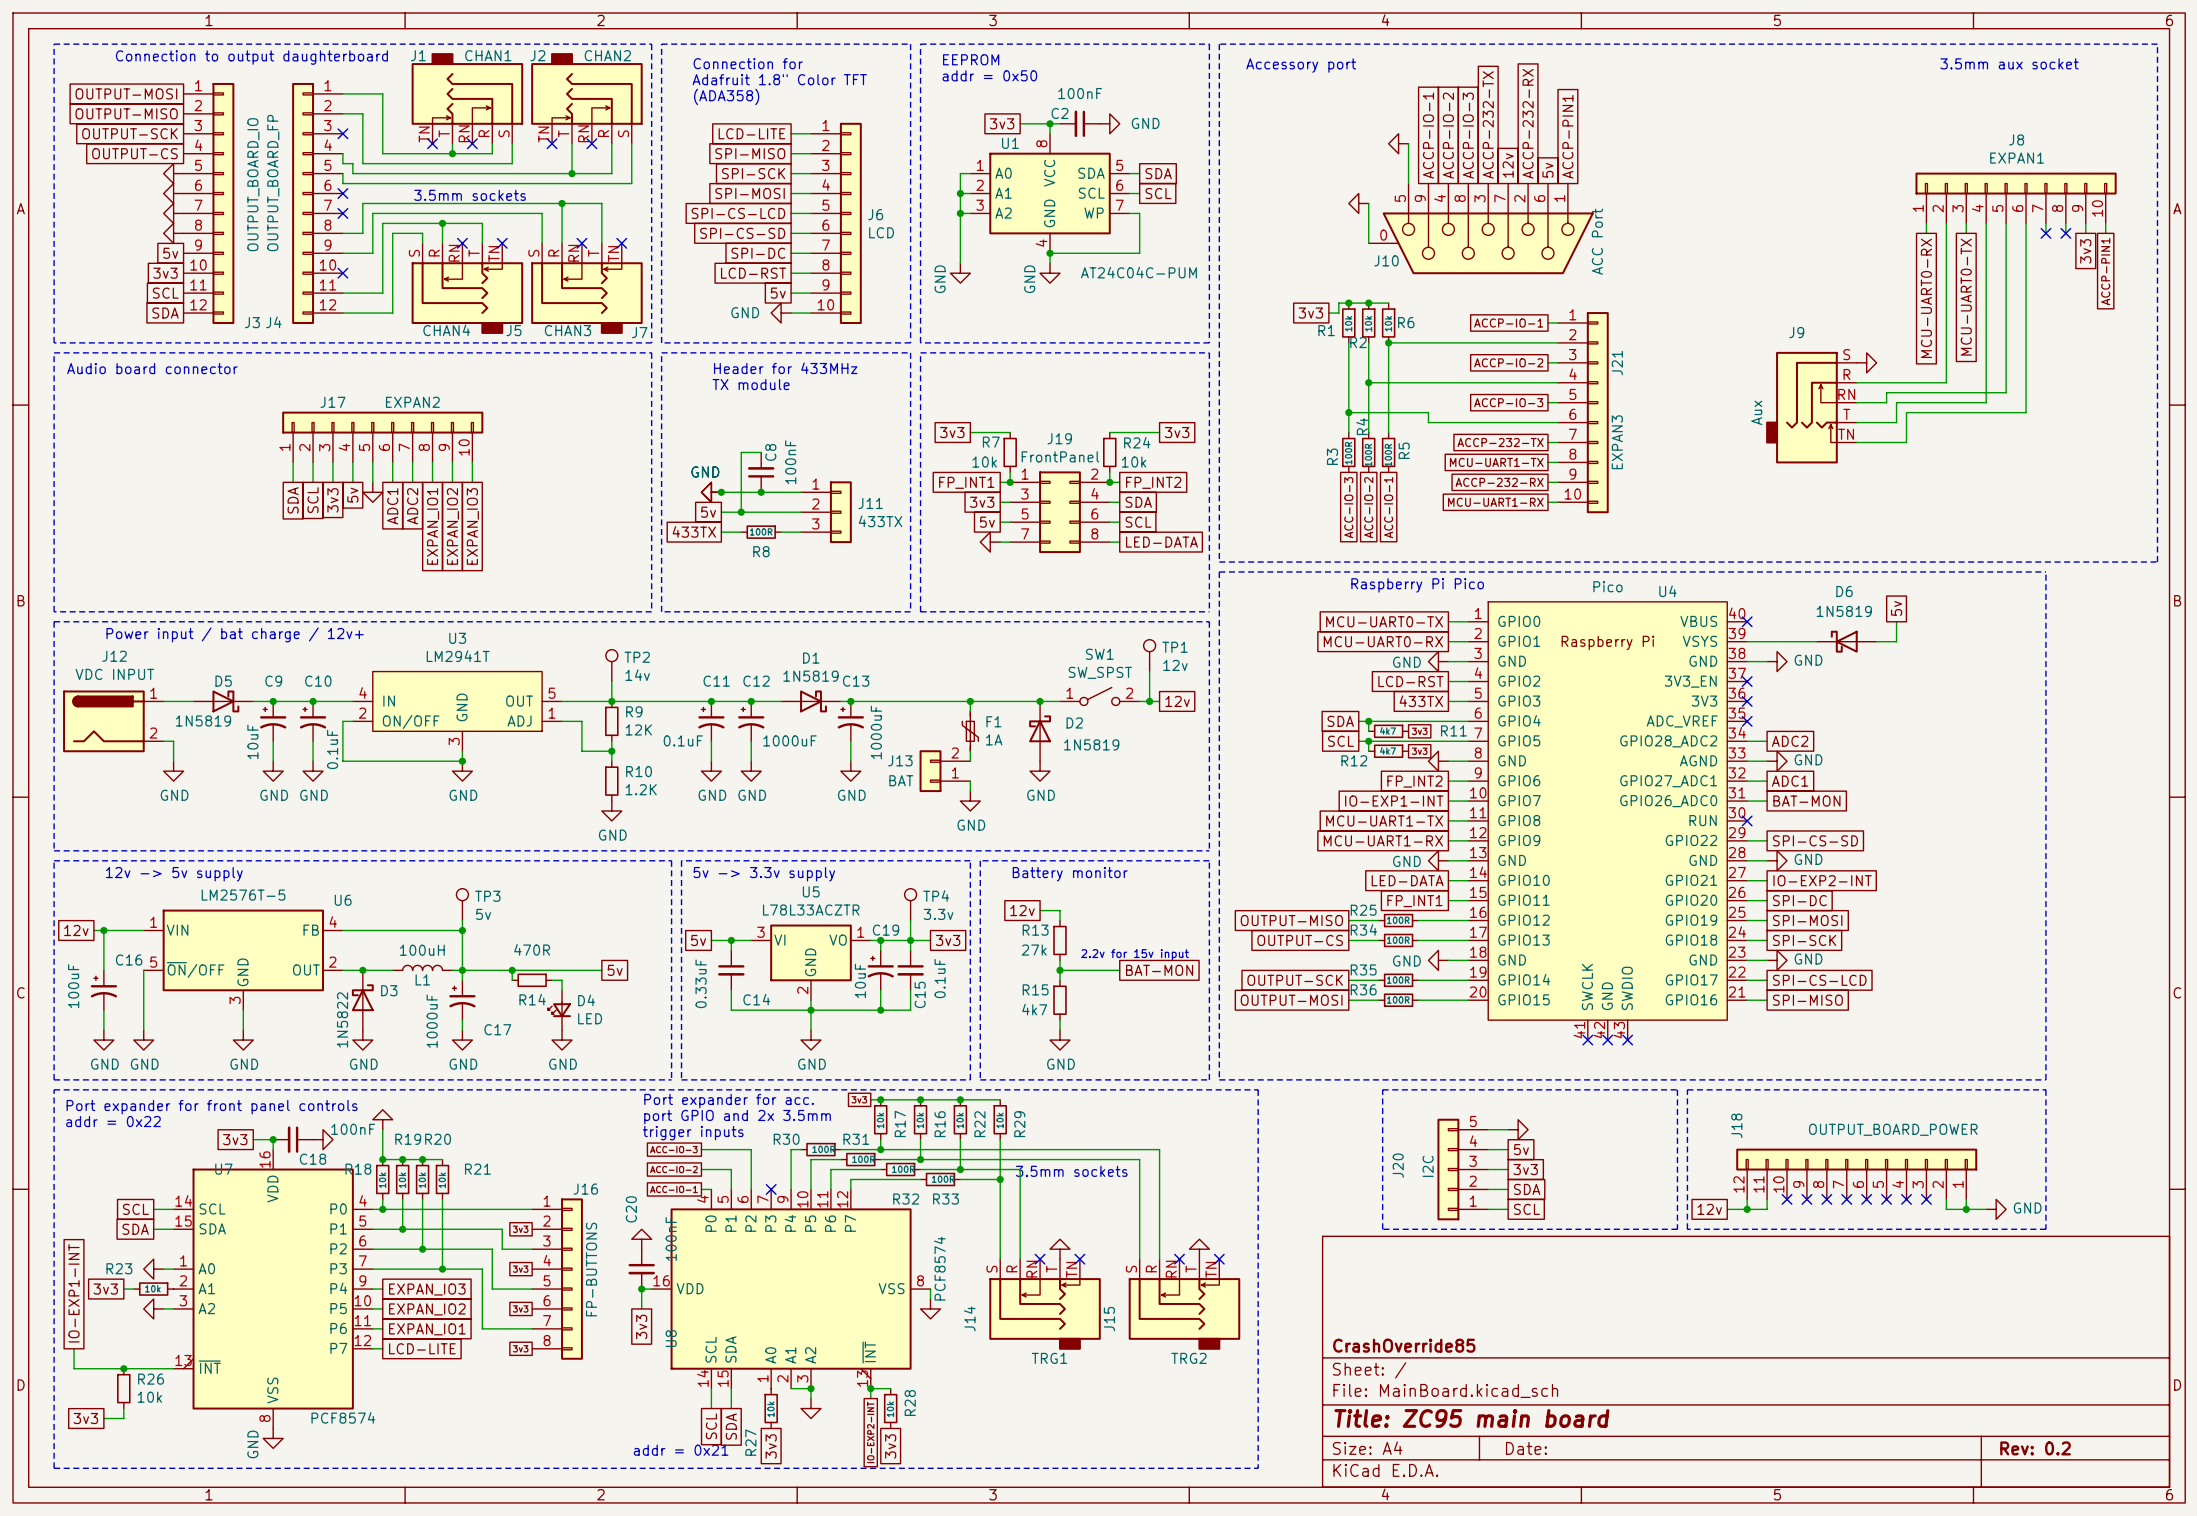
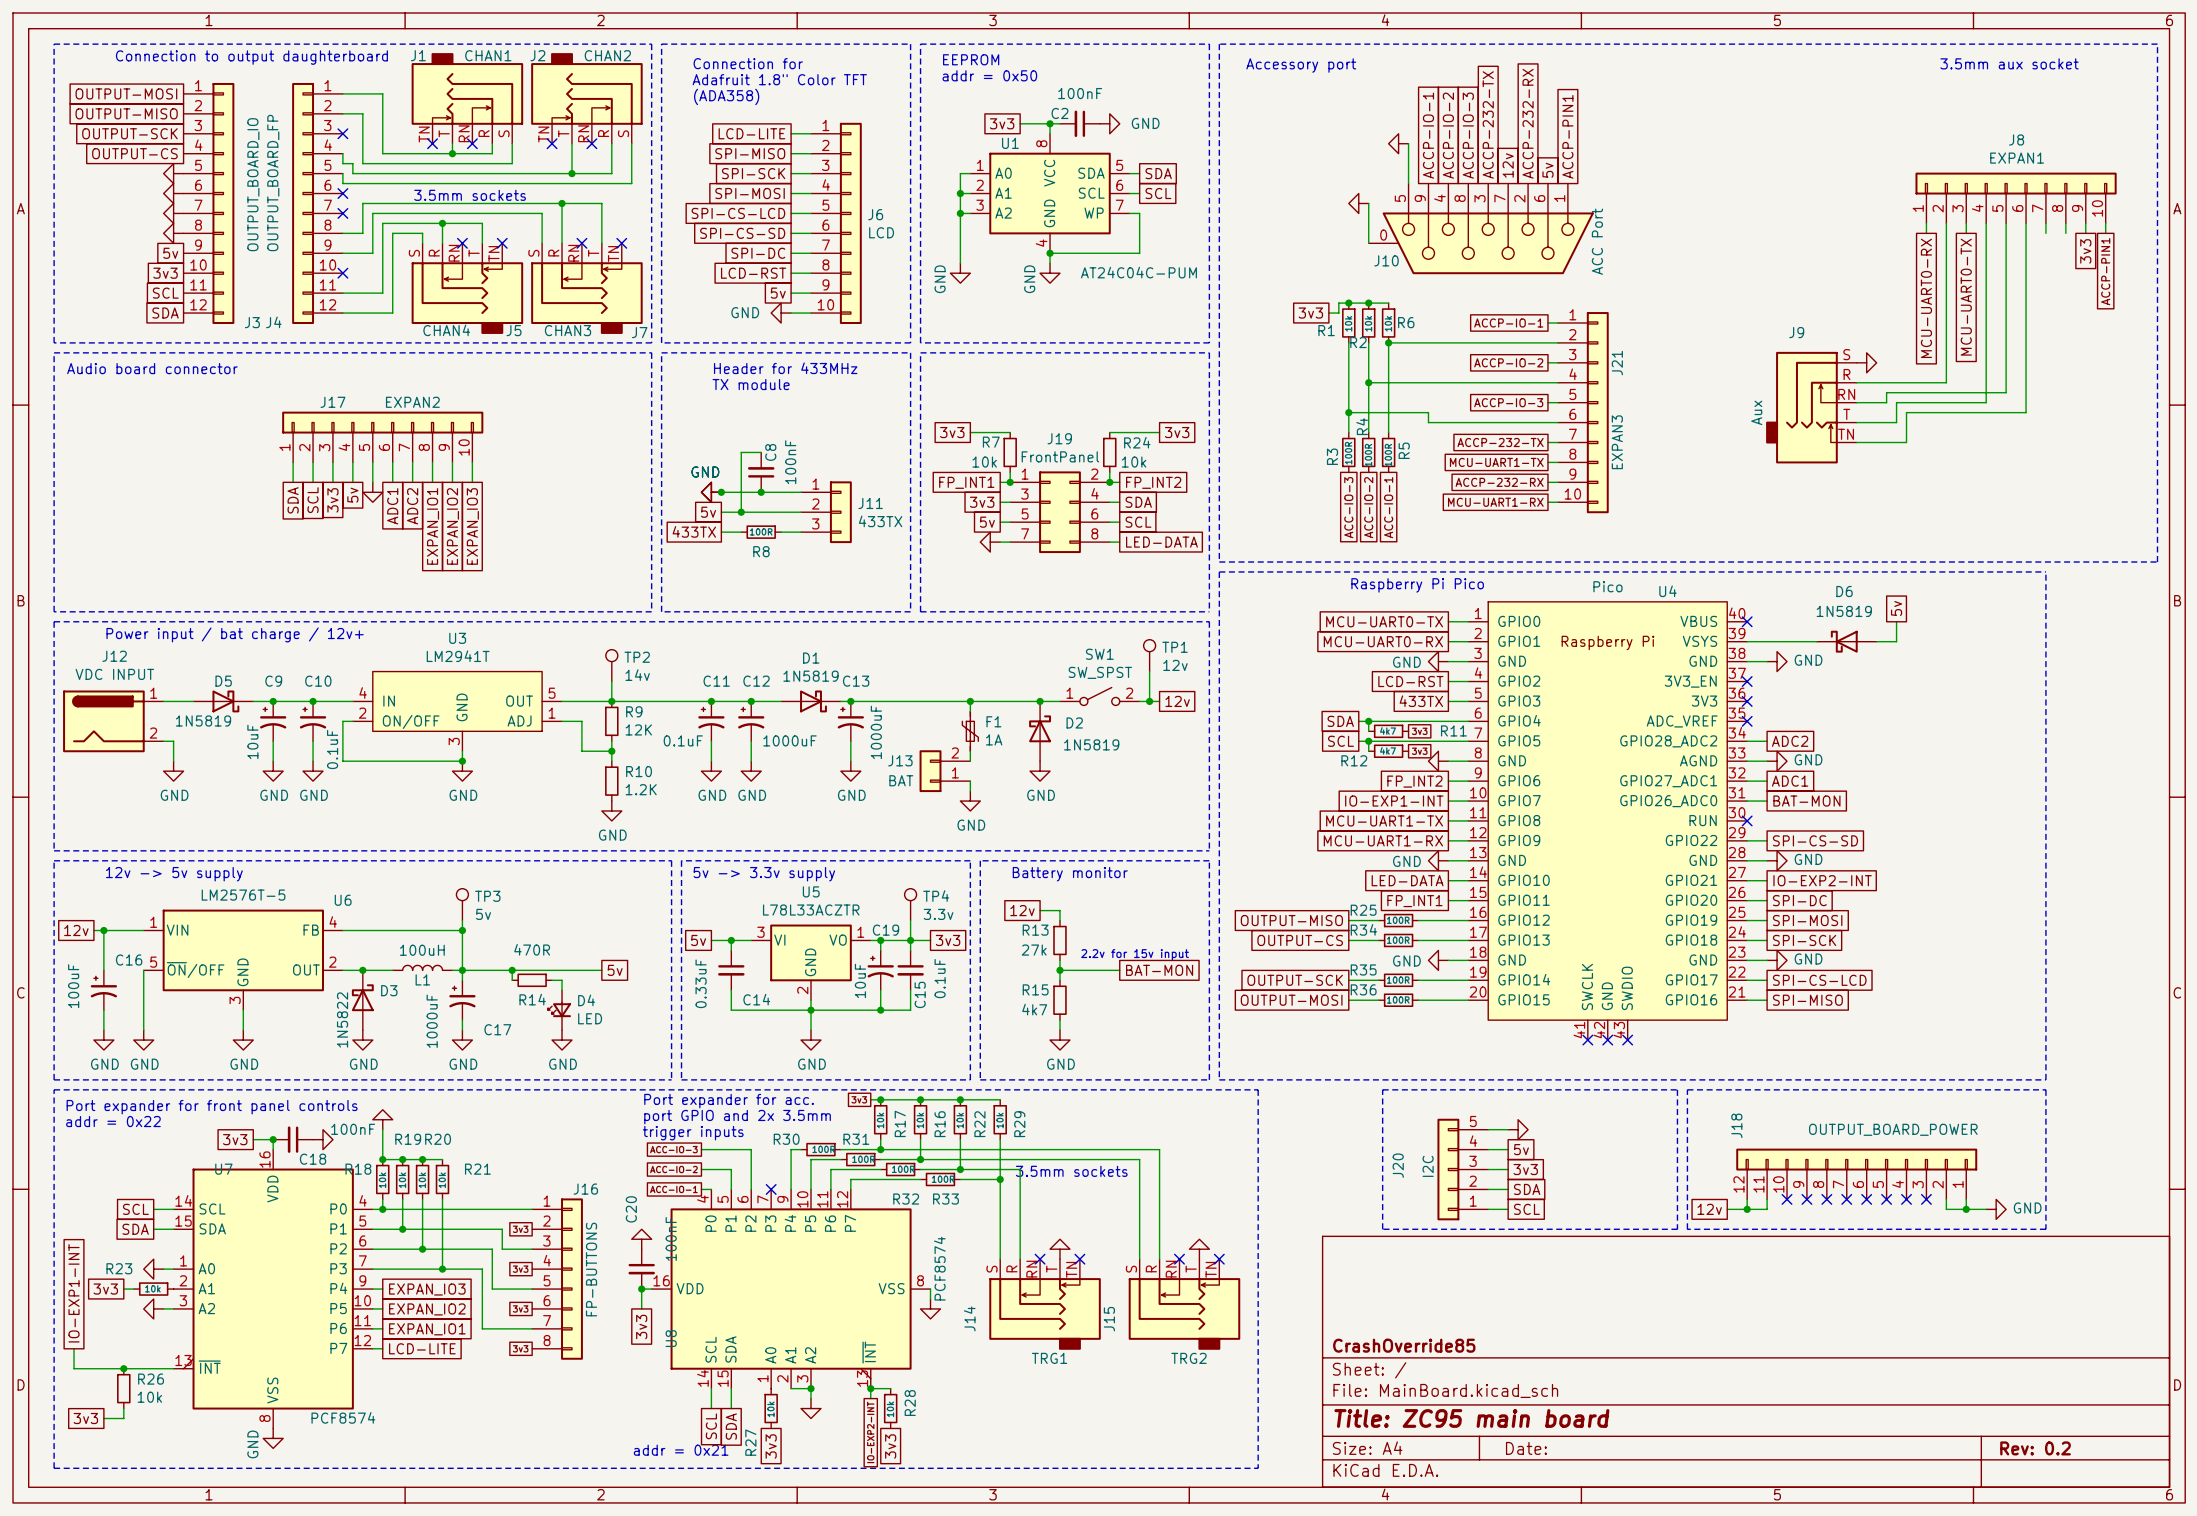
no-connect mark: (2045, 233) -> none
no-connect mark: (2065, 233) -> none

